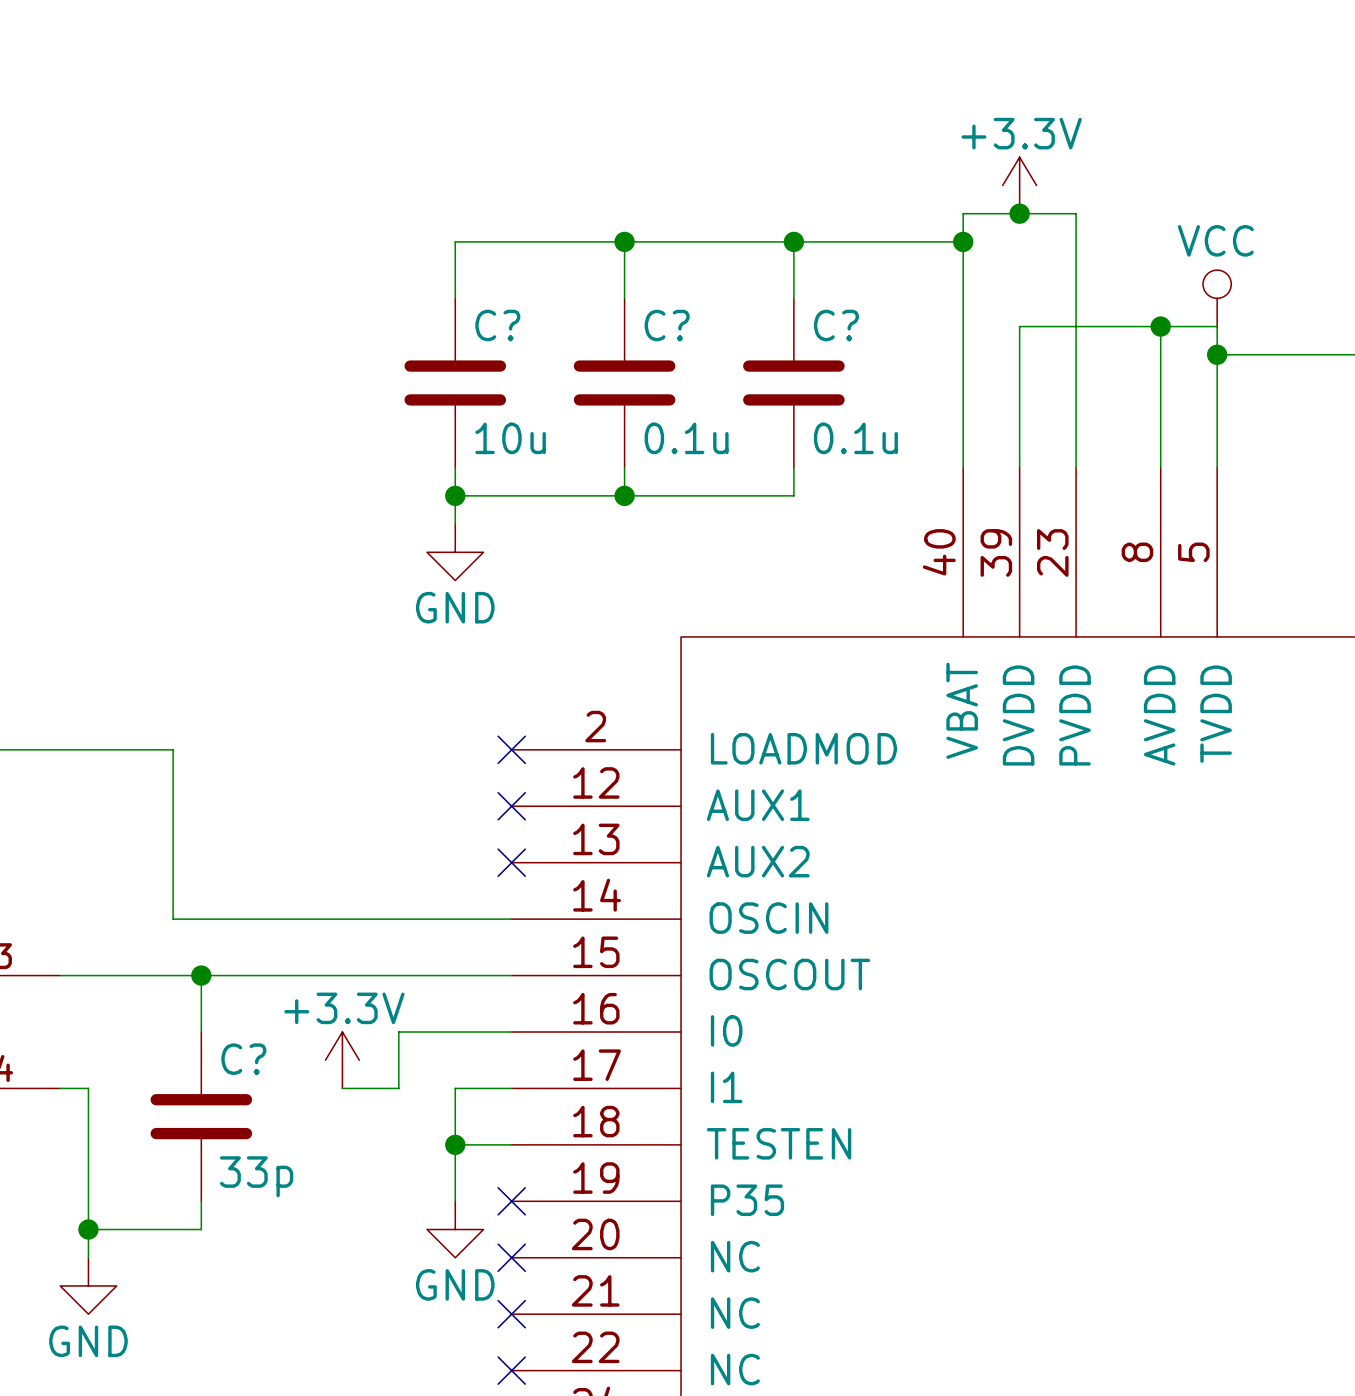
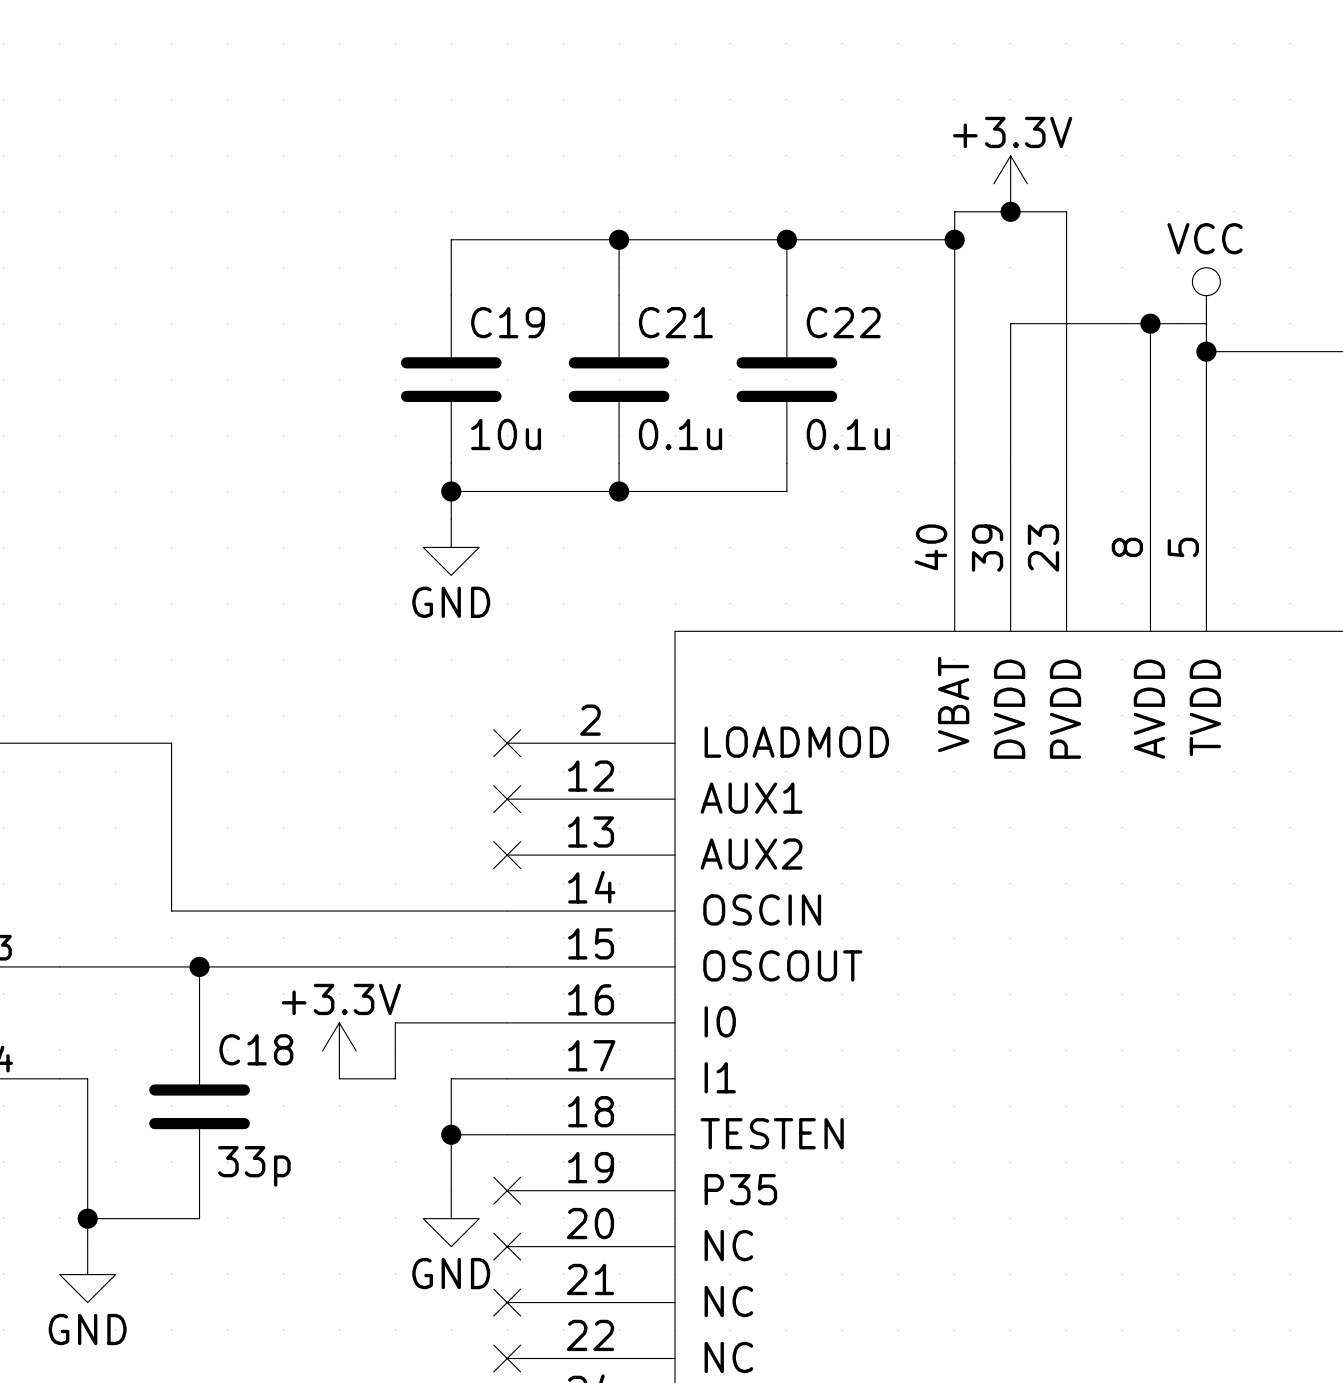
C? name: C? (497, 325) -> C19 (508, 322)
C? name: C? (667, 325) -> C21 (675, 322)
C? name: C? (836, 325) -> C22 (843, 322)
C? name: C? (243, 1059) -> C18 (256, 1049)

